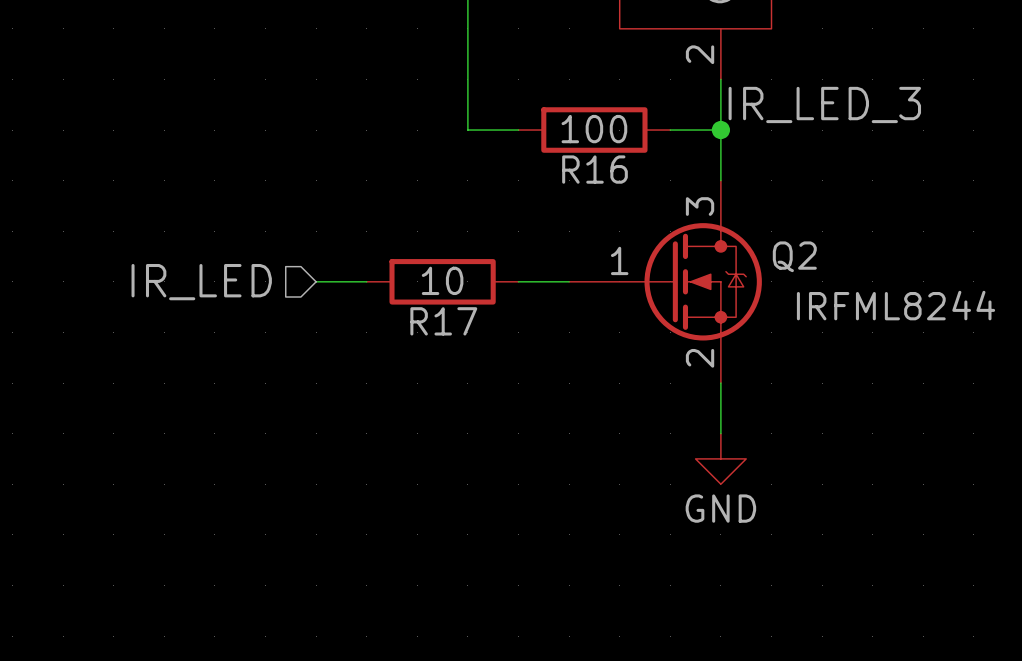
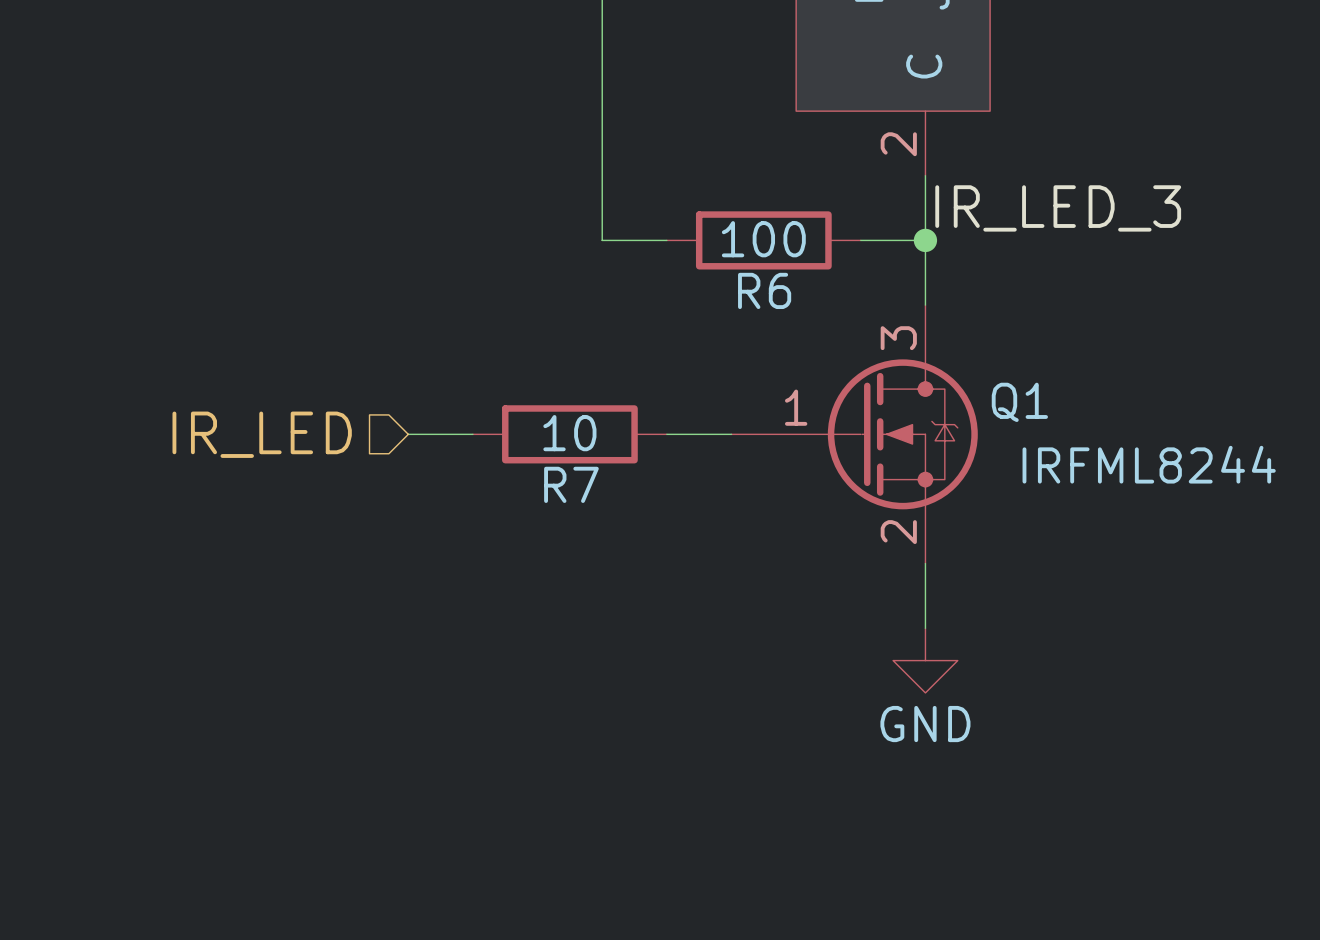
R16 name: R16 (595, 169) -> R6 (764, 290)
Q2 name: Q2 (794, 256) -> Q1 (1019, 402)
R17 name: R17 (443, 321) -> R7 (571, 484)

